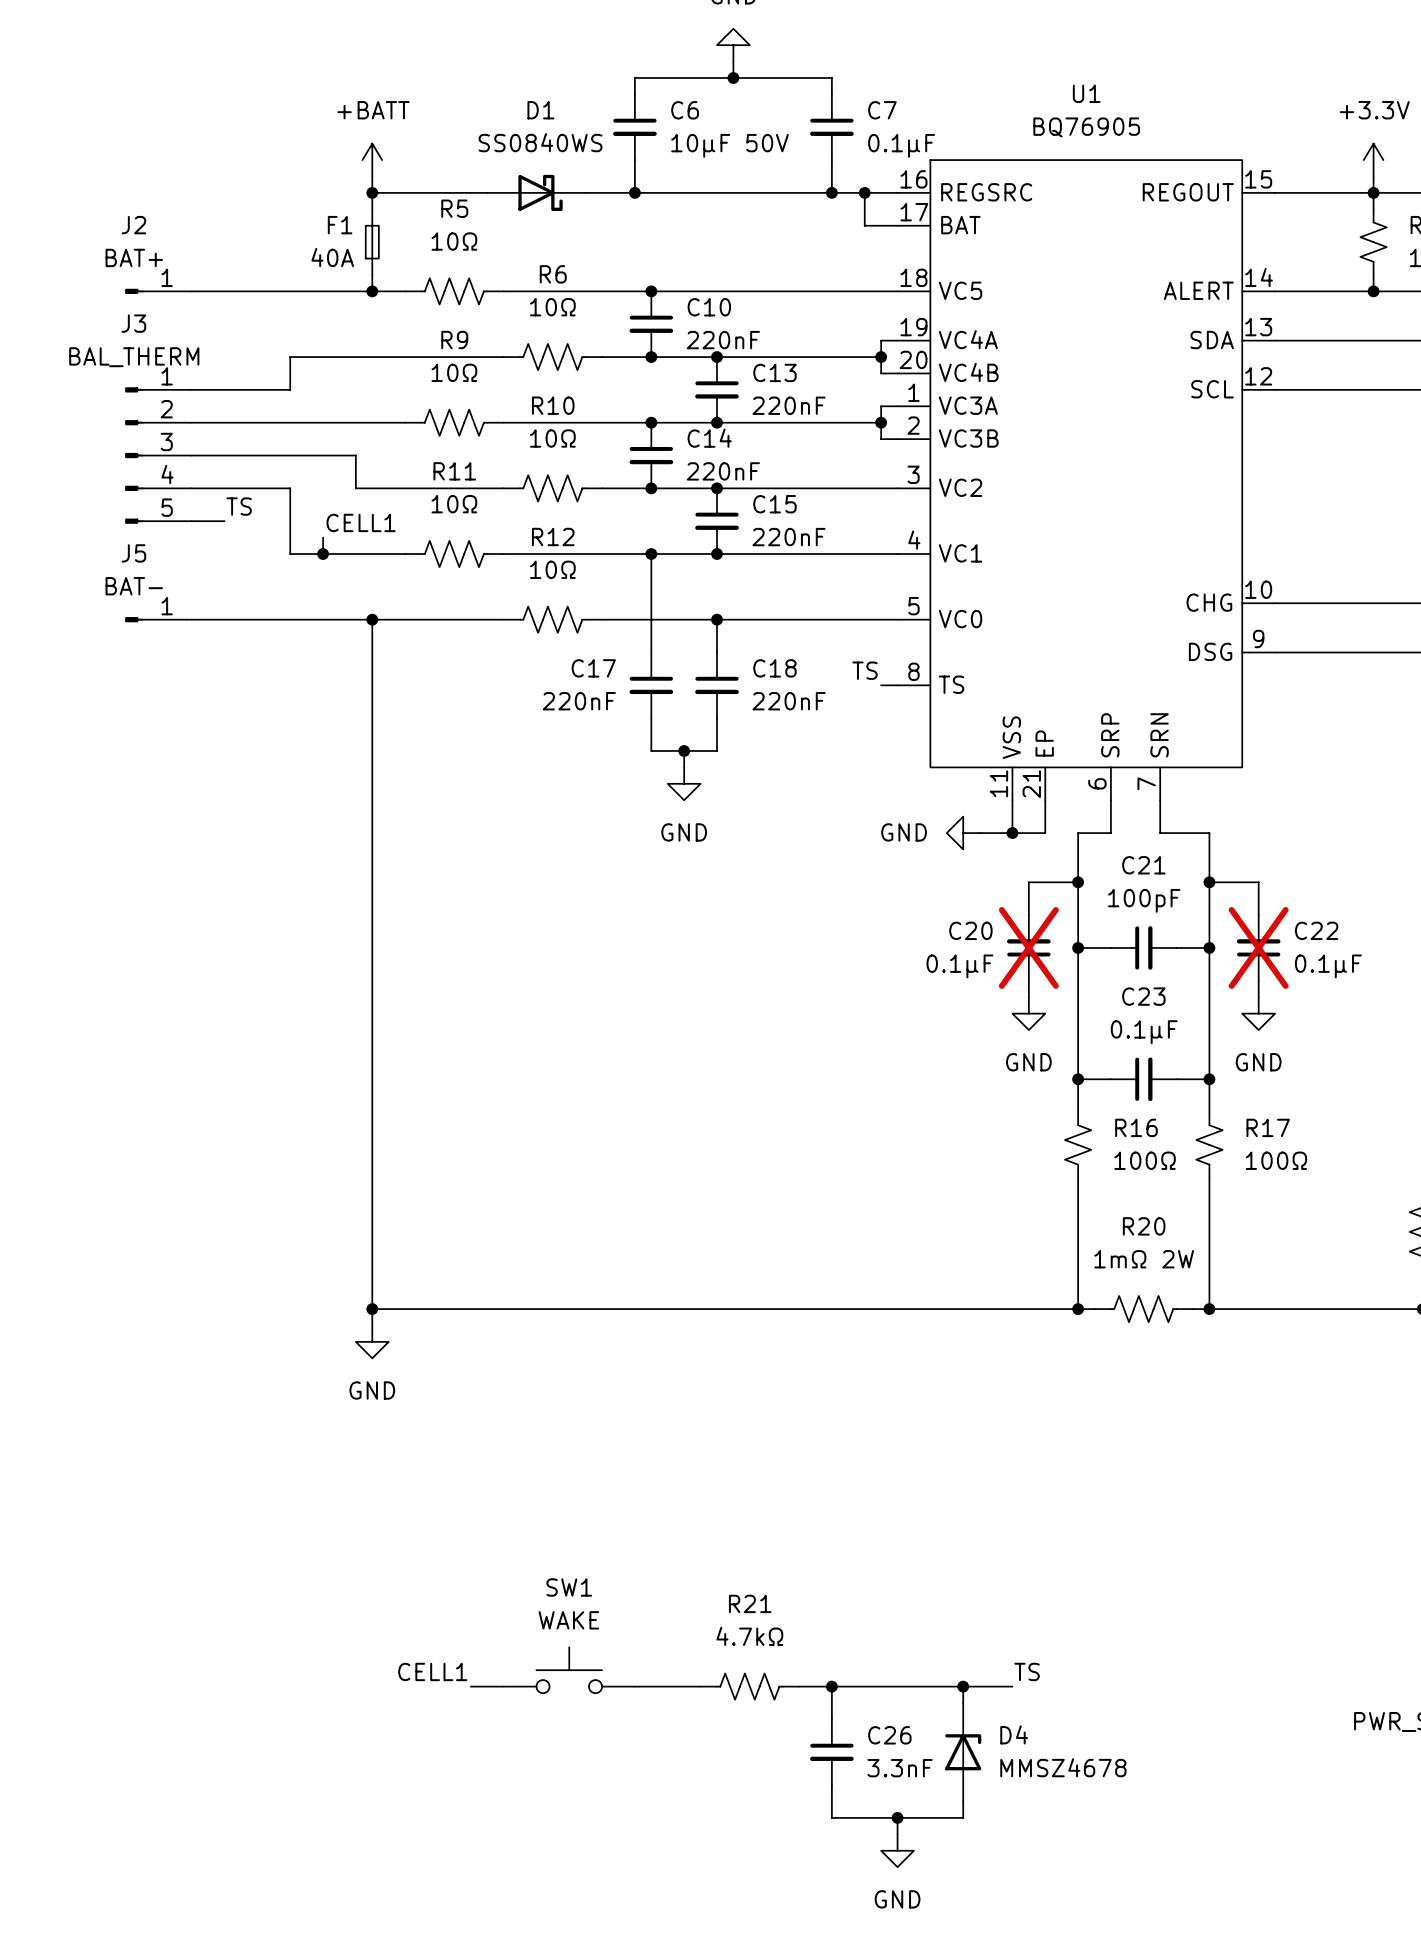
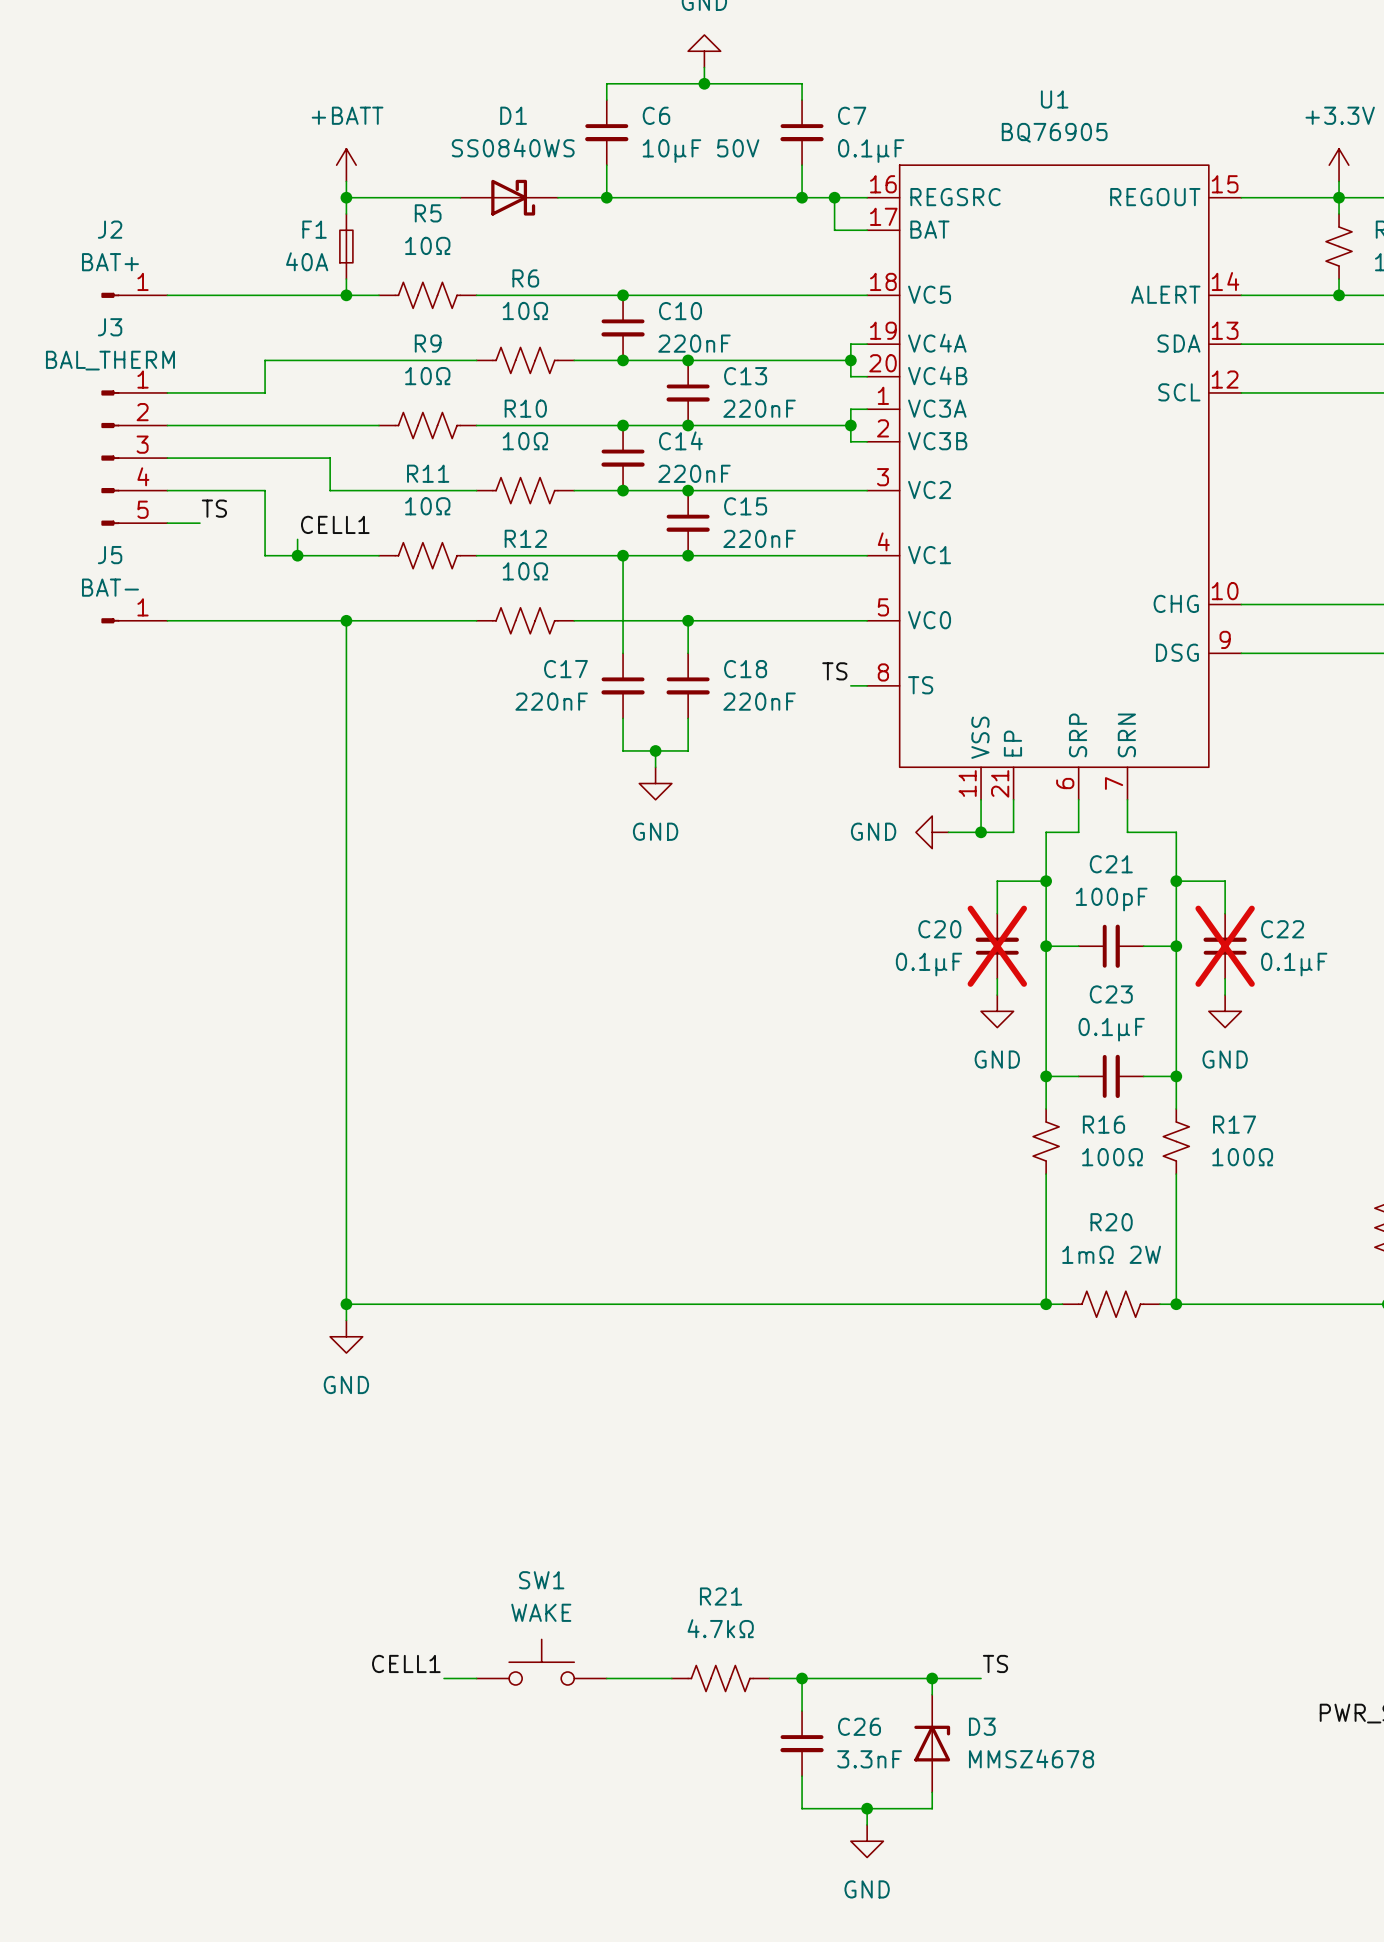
D4 name: D4 (1014, 1734) -> D3 (982, 1726)

